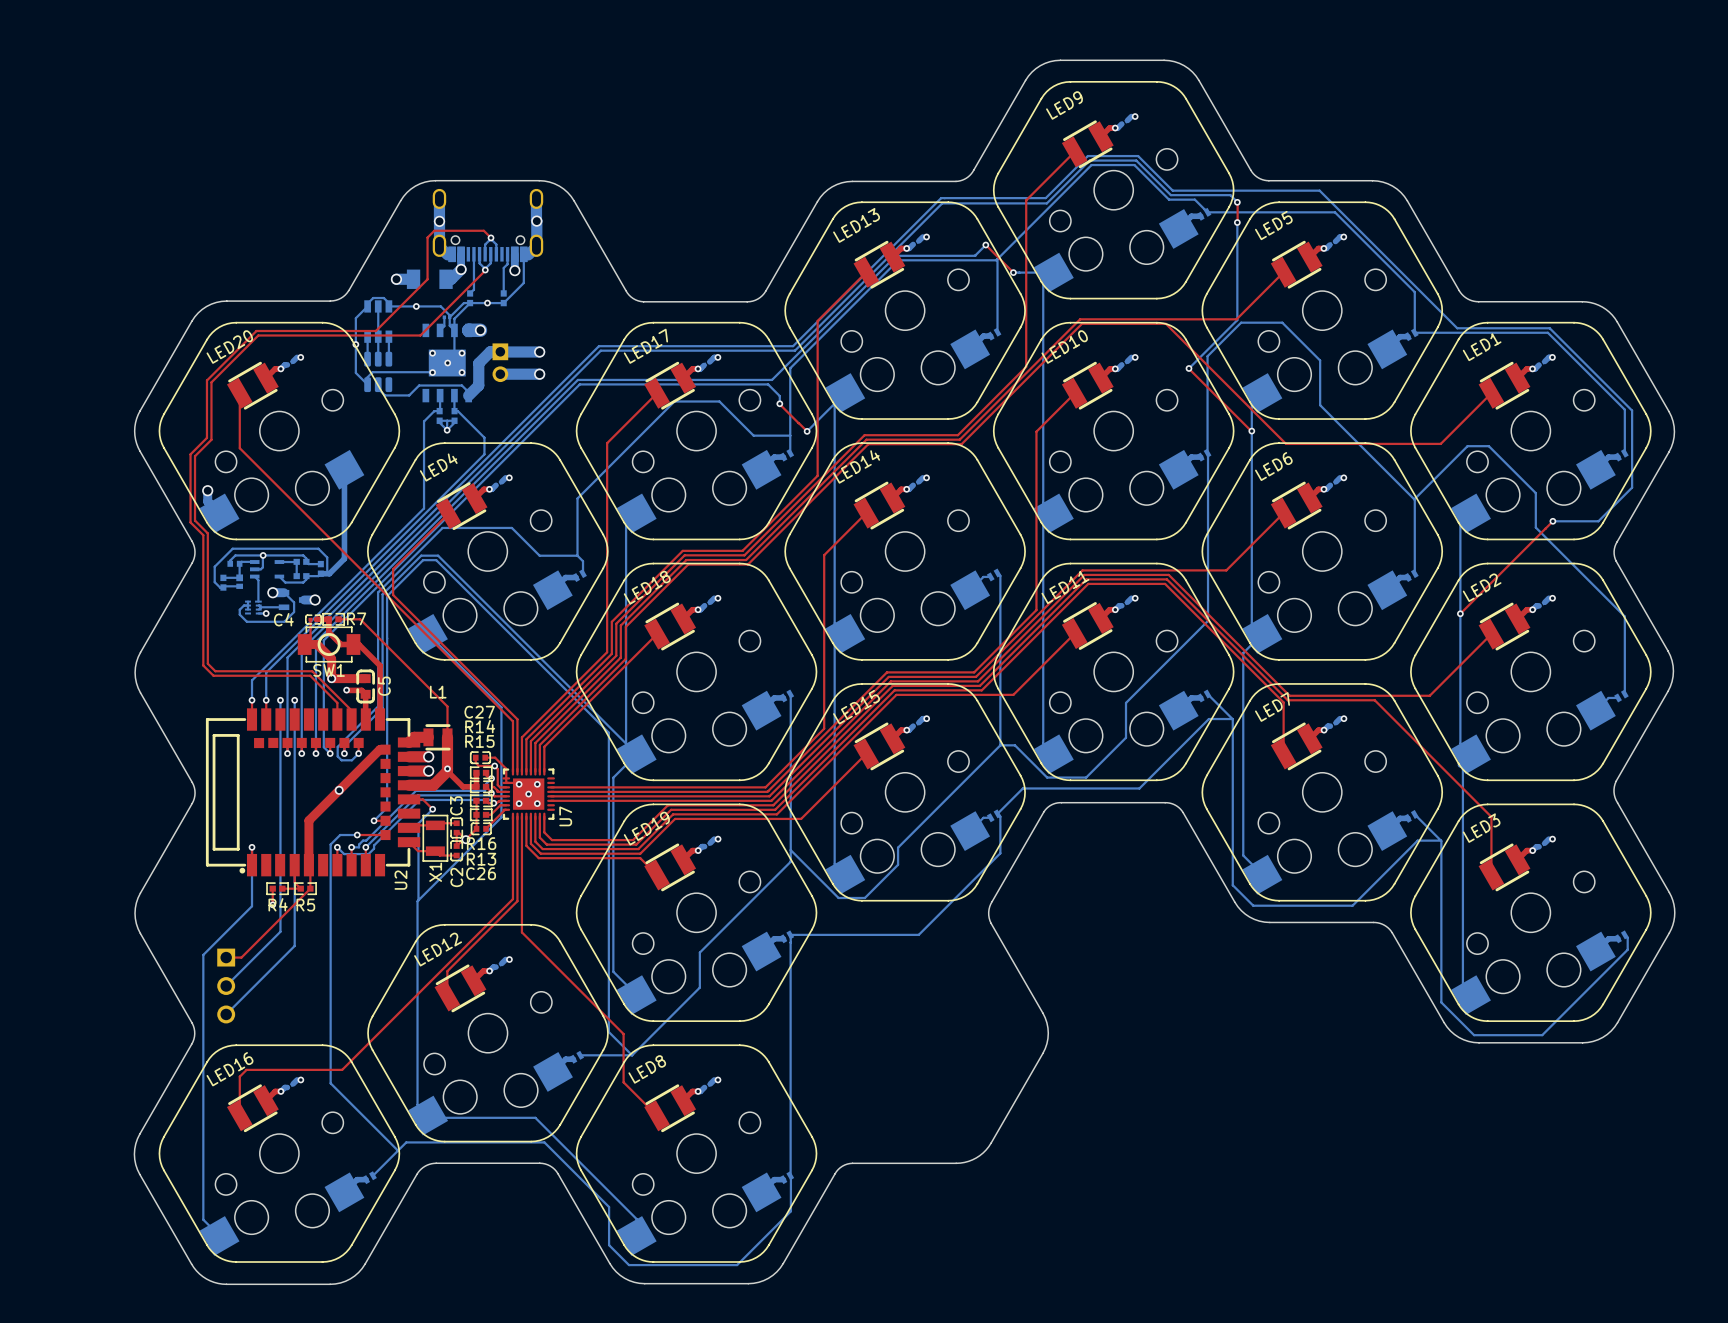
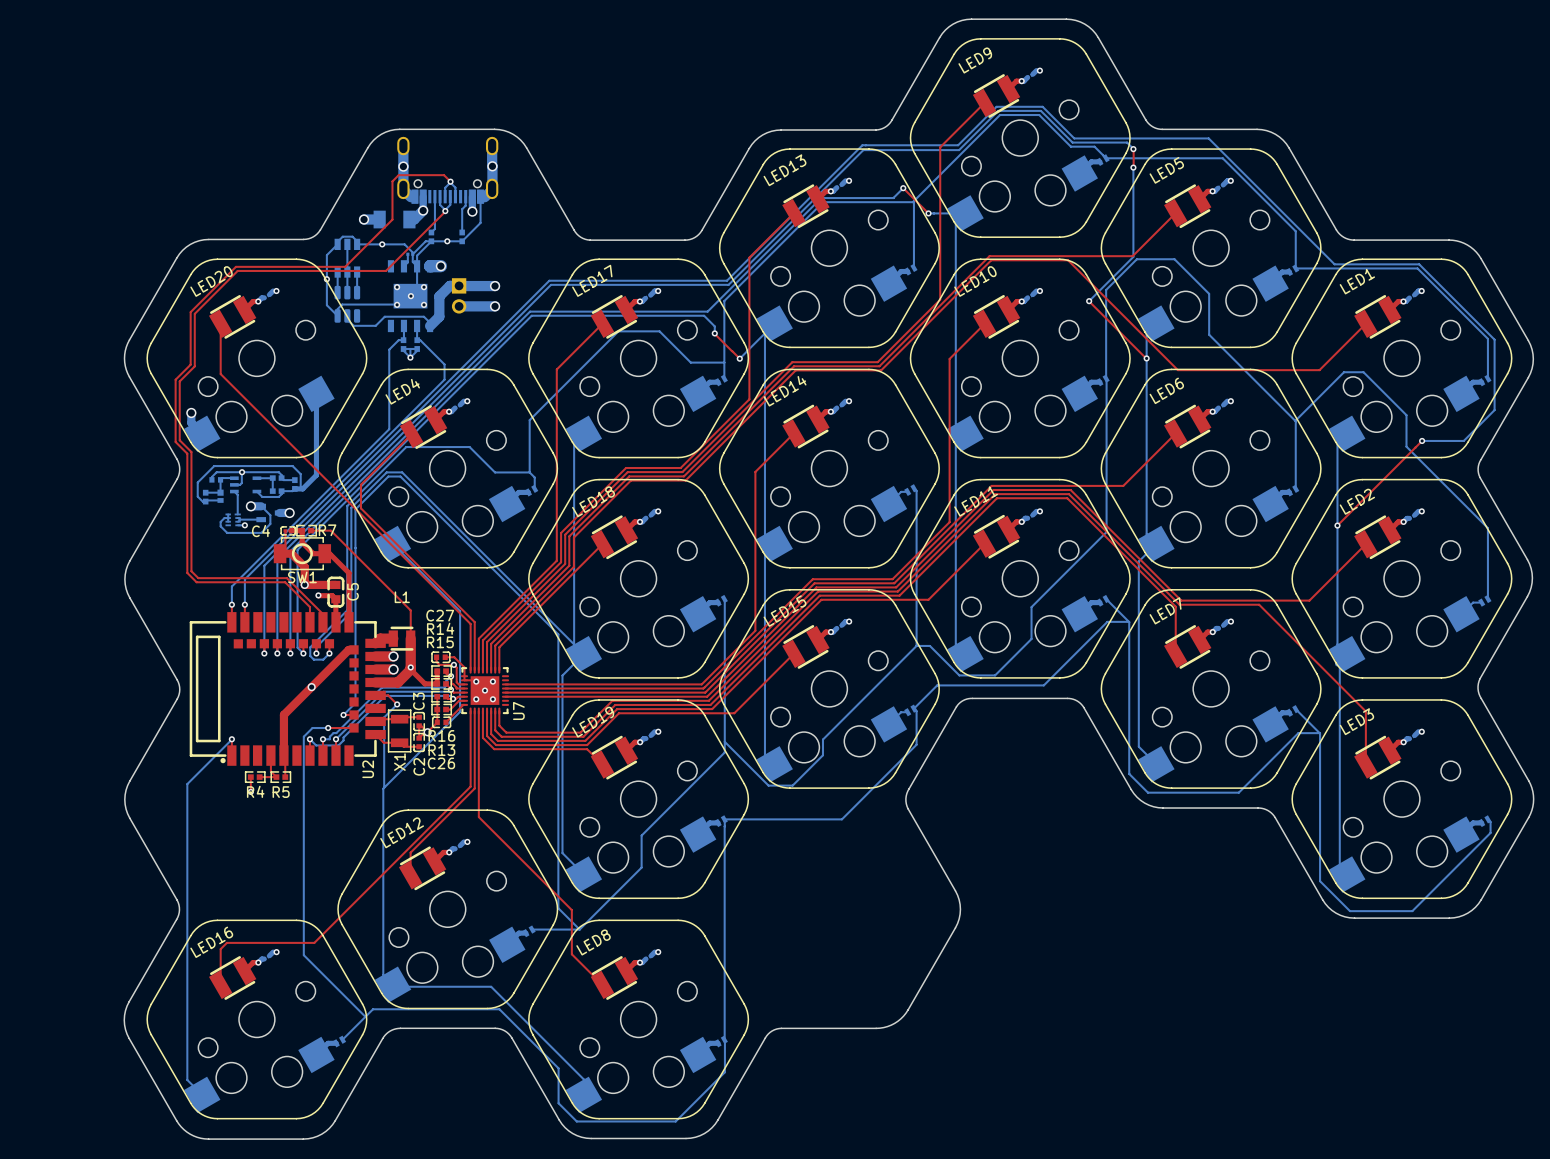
bottom track: (280, 700) (280, 931) (226, 986) -> none
via: (280, 700) -> none
bottom track: (294, 700) (294, 945) (226, 1014) -> none
via: (294, 700) -> none
bottom track: (252, 847) (252, 906) (203, 954) -> (231, 739) (187, 784) (187, 837)
top track: (310, 888) (241, 957) (226, 957) -> none
part: (226, 986) -> none

